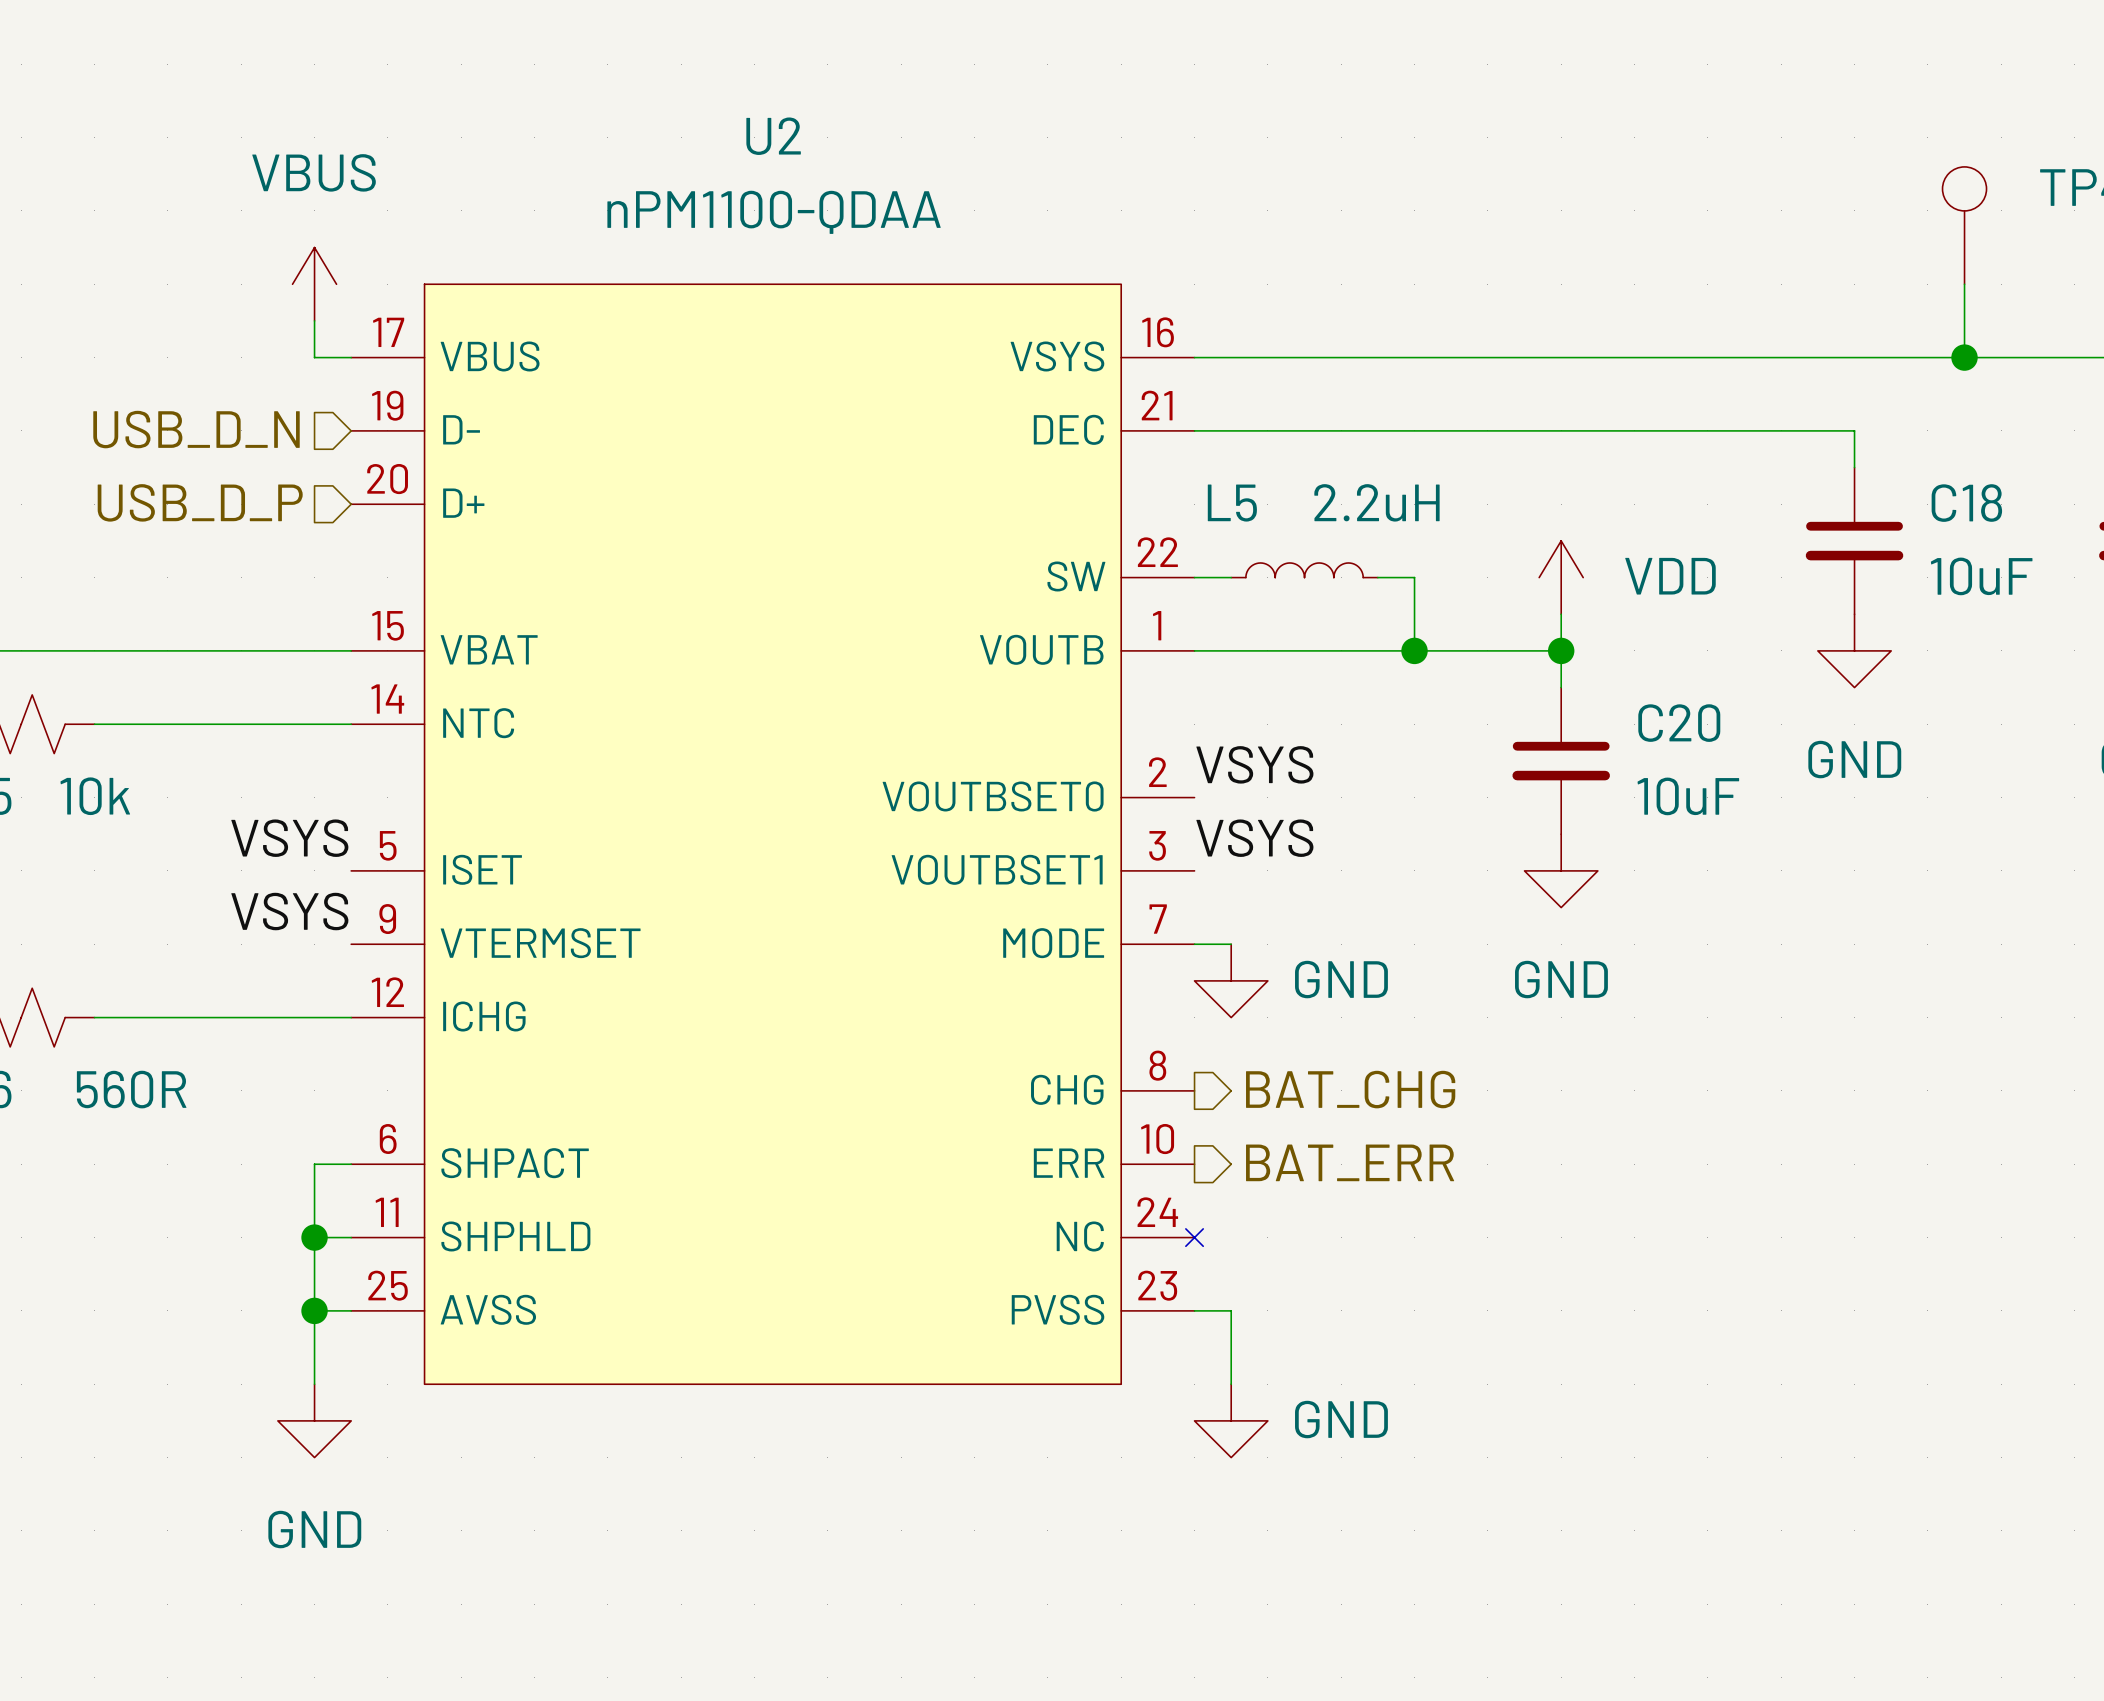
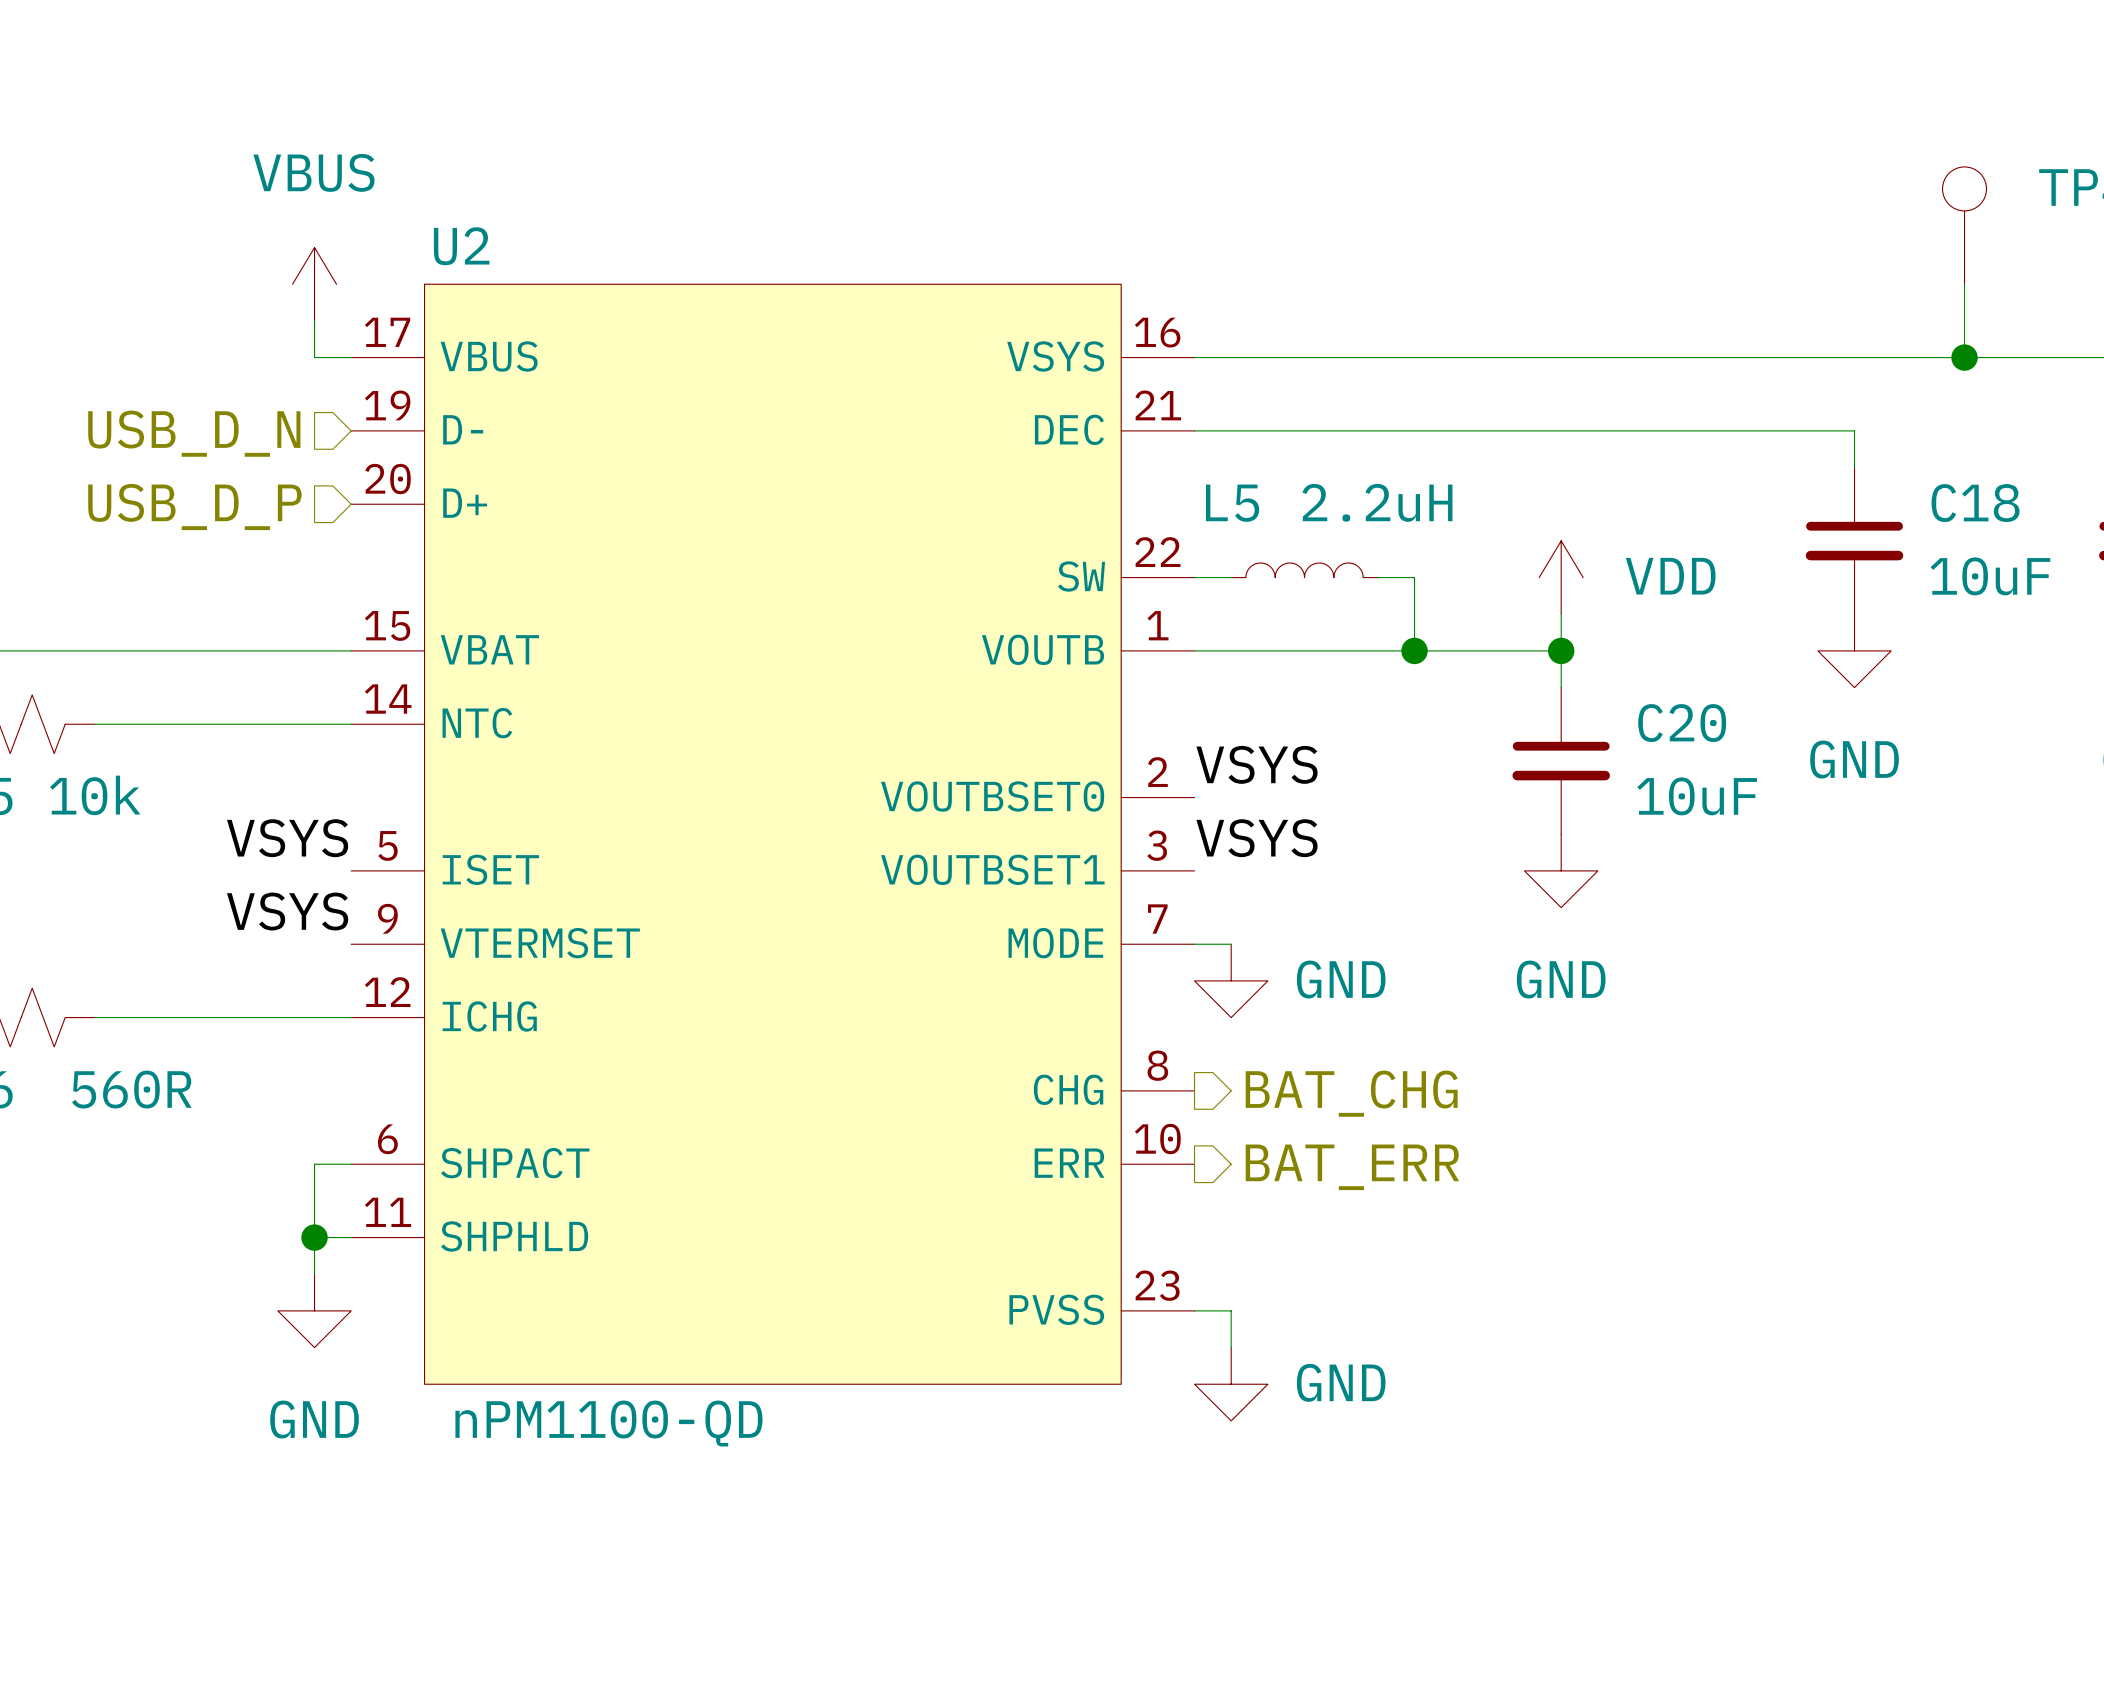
U2 name position: U2 (773, 136) -> U2 (461, 246)
U2 value: nPM1100-QDAA (774, 212) -> nPM1100-QD (608, 1423)
U2 symbol: [351, 284, 1204, 1385] -> [351, 284, 1195, 1385]
wire: (314, 1274) (314, 1384) -> none
junction: (314, 1310) -> none
power symbol position: GND (314, 1420) -> GND (314, 1310)
power symbol position: GND (1231, 1420) -> GND (1231, 1384)

